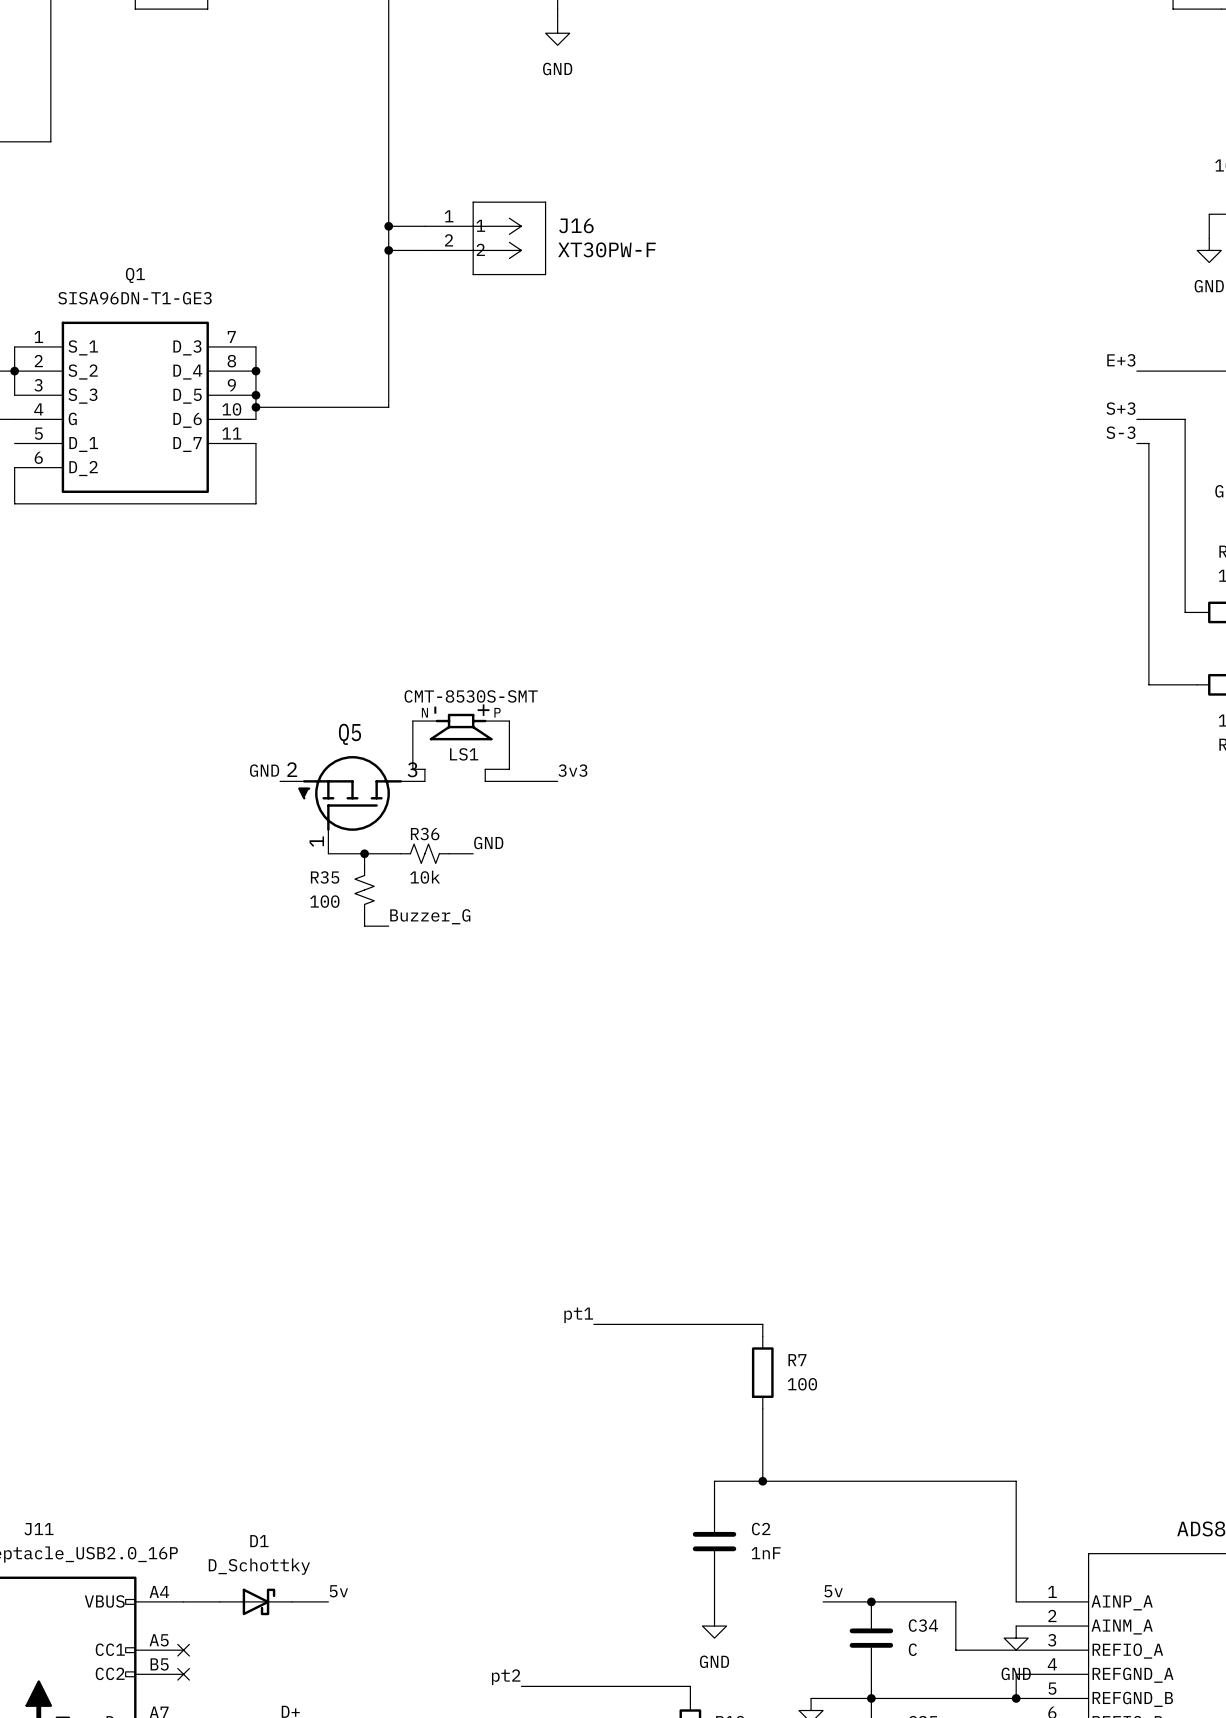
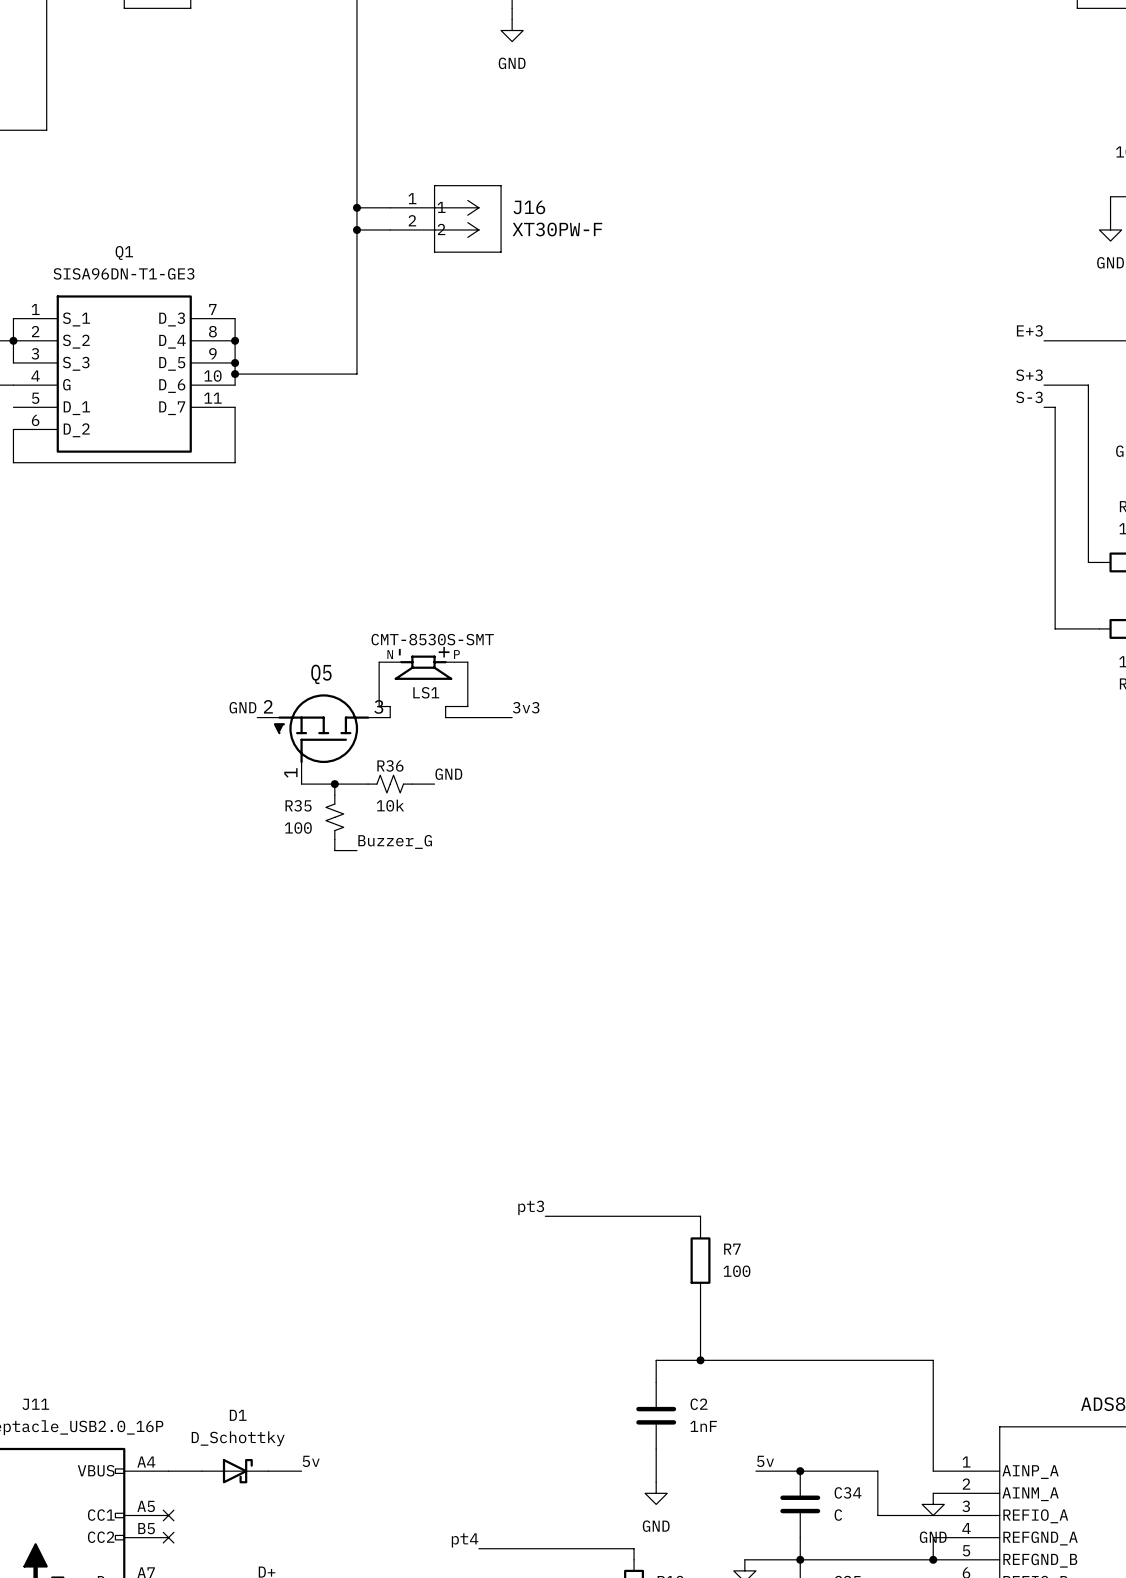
label: pt1 (578, 1315) -> pt3 (531, 1207)
label: pt2 (506, 1677) -> pt4 (465, 1540)

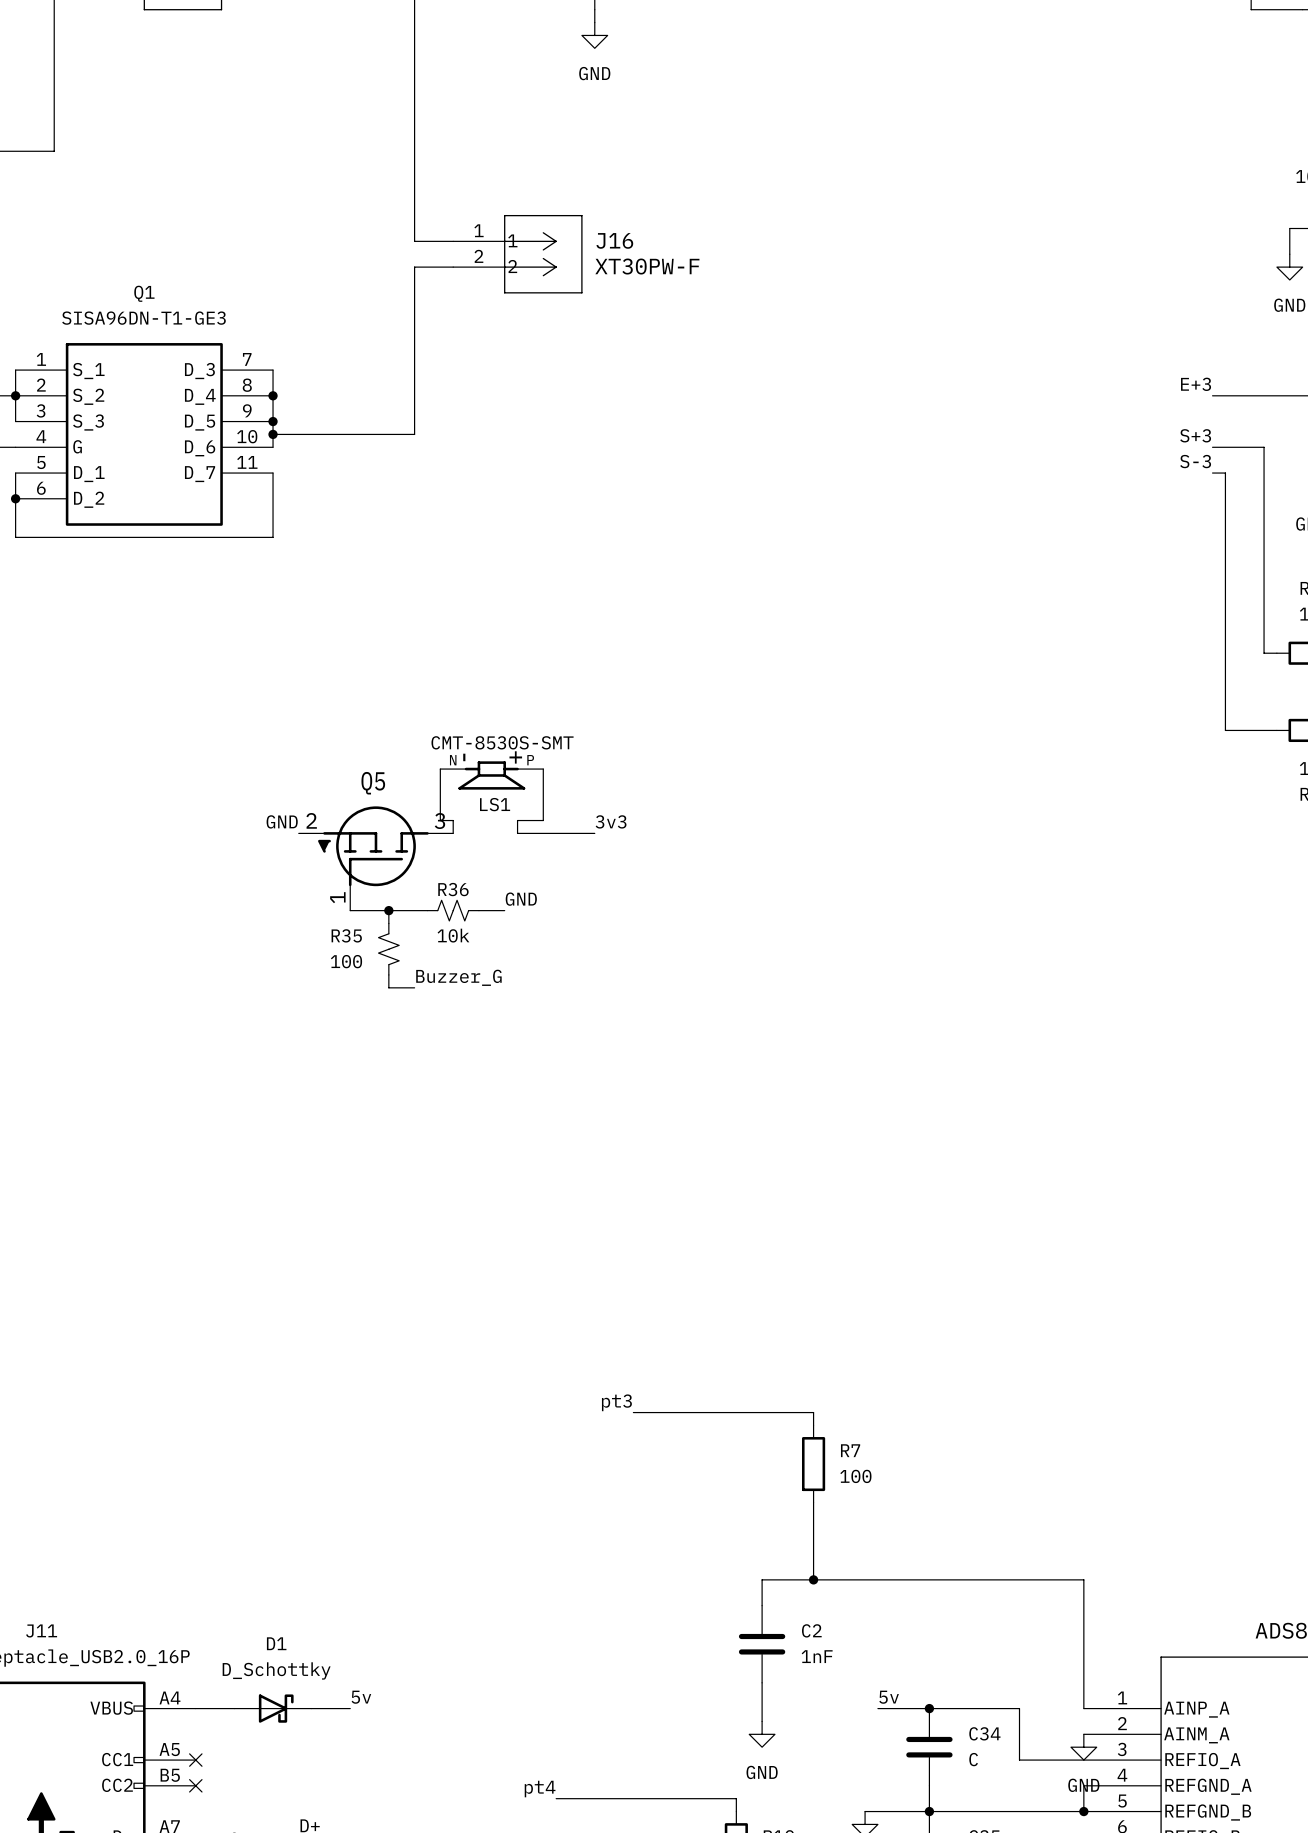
wire: (356, 207) (356, 229) -> none
junction: (356, 207) -> none
junction: (356, 229) -> none
wire: none -> (15, 473) (15, 498)
junction: none -> (15, 498)

